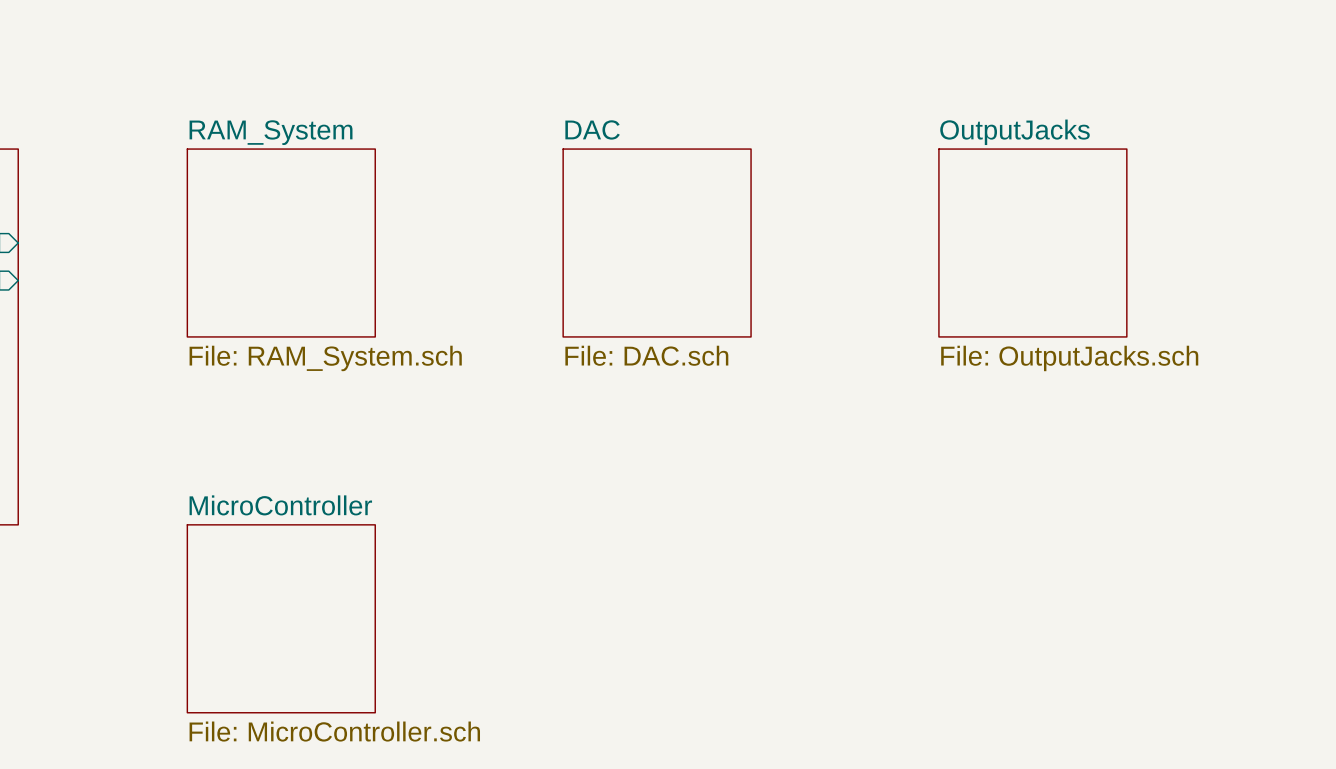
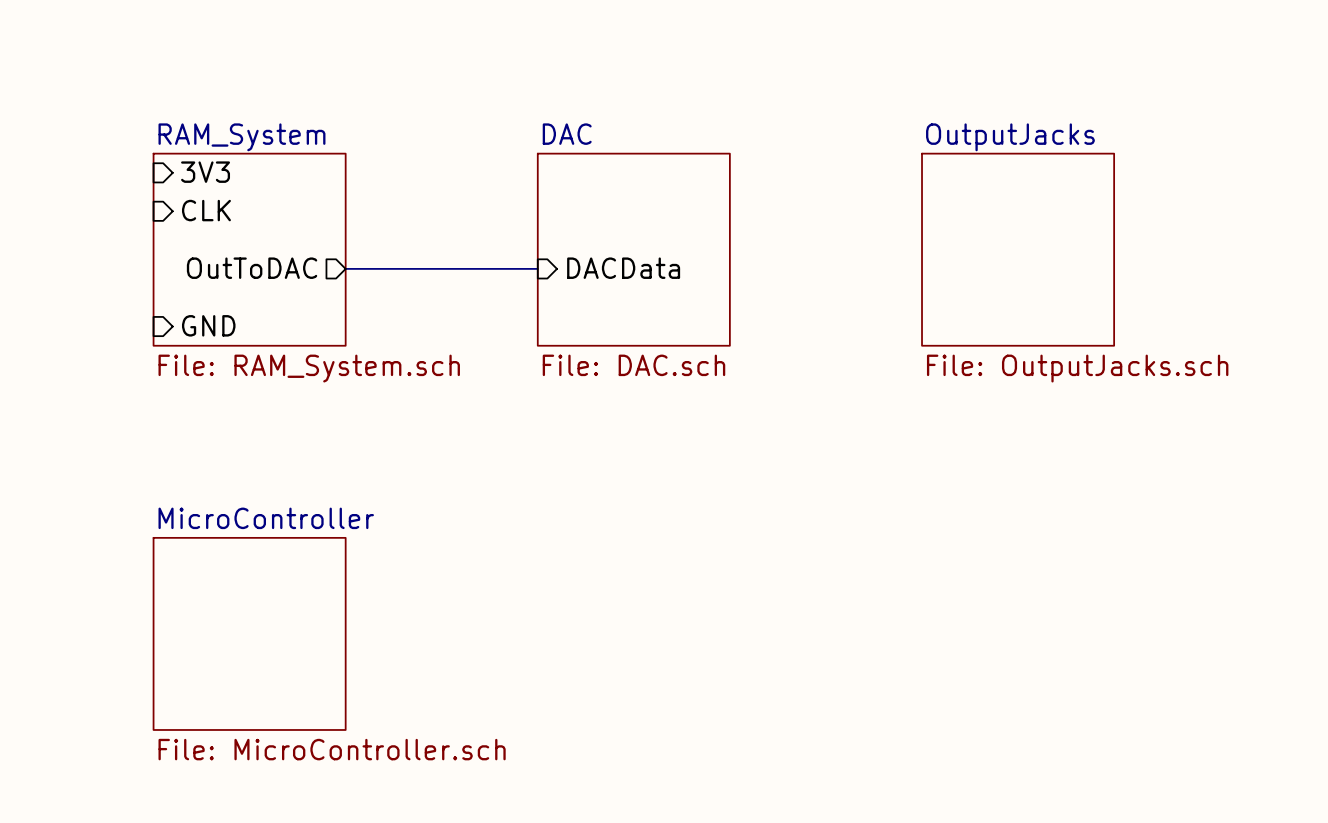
sheet pin: none -> 3V3 (205, 172)
sheet pin: none -> CLK (206, 210)
sheet pin: none -> OutToDAC (252, 268)
bus: none -> (345, 268) (537, 268)
sheet pin: none -> DACData (623, 268)
sheet pin: none -> GND (208, 325)

